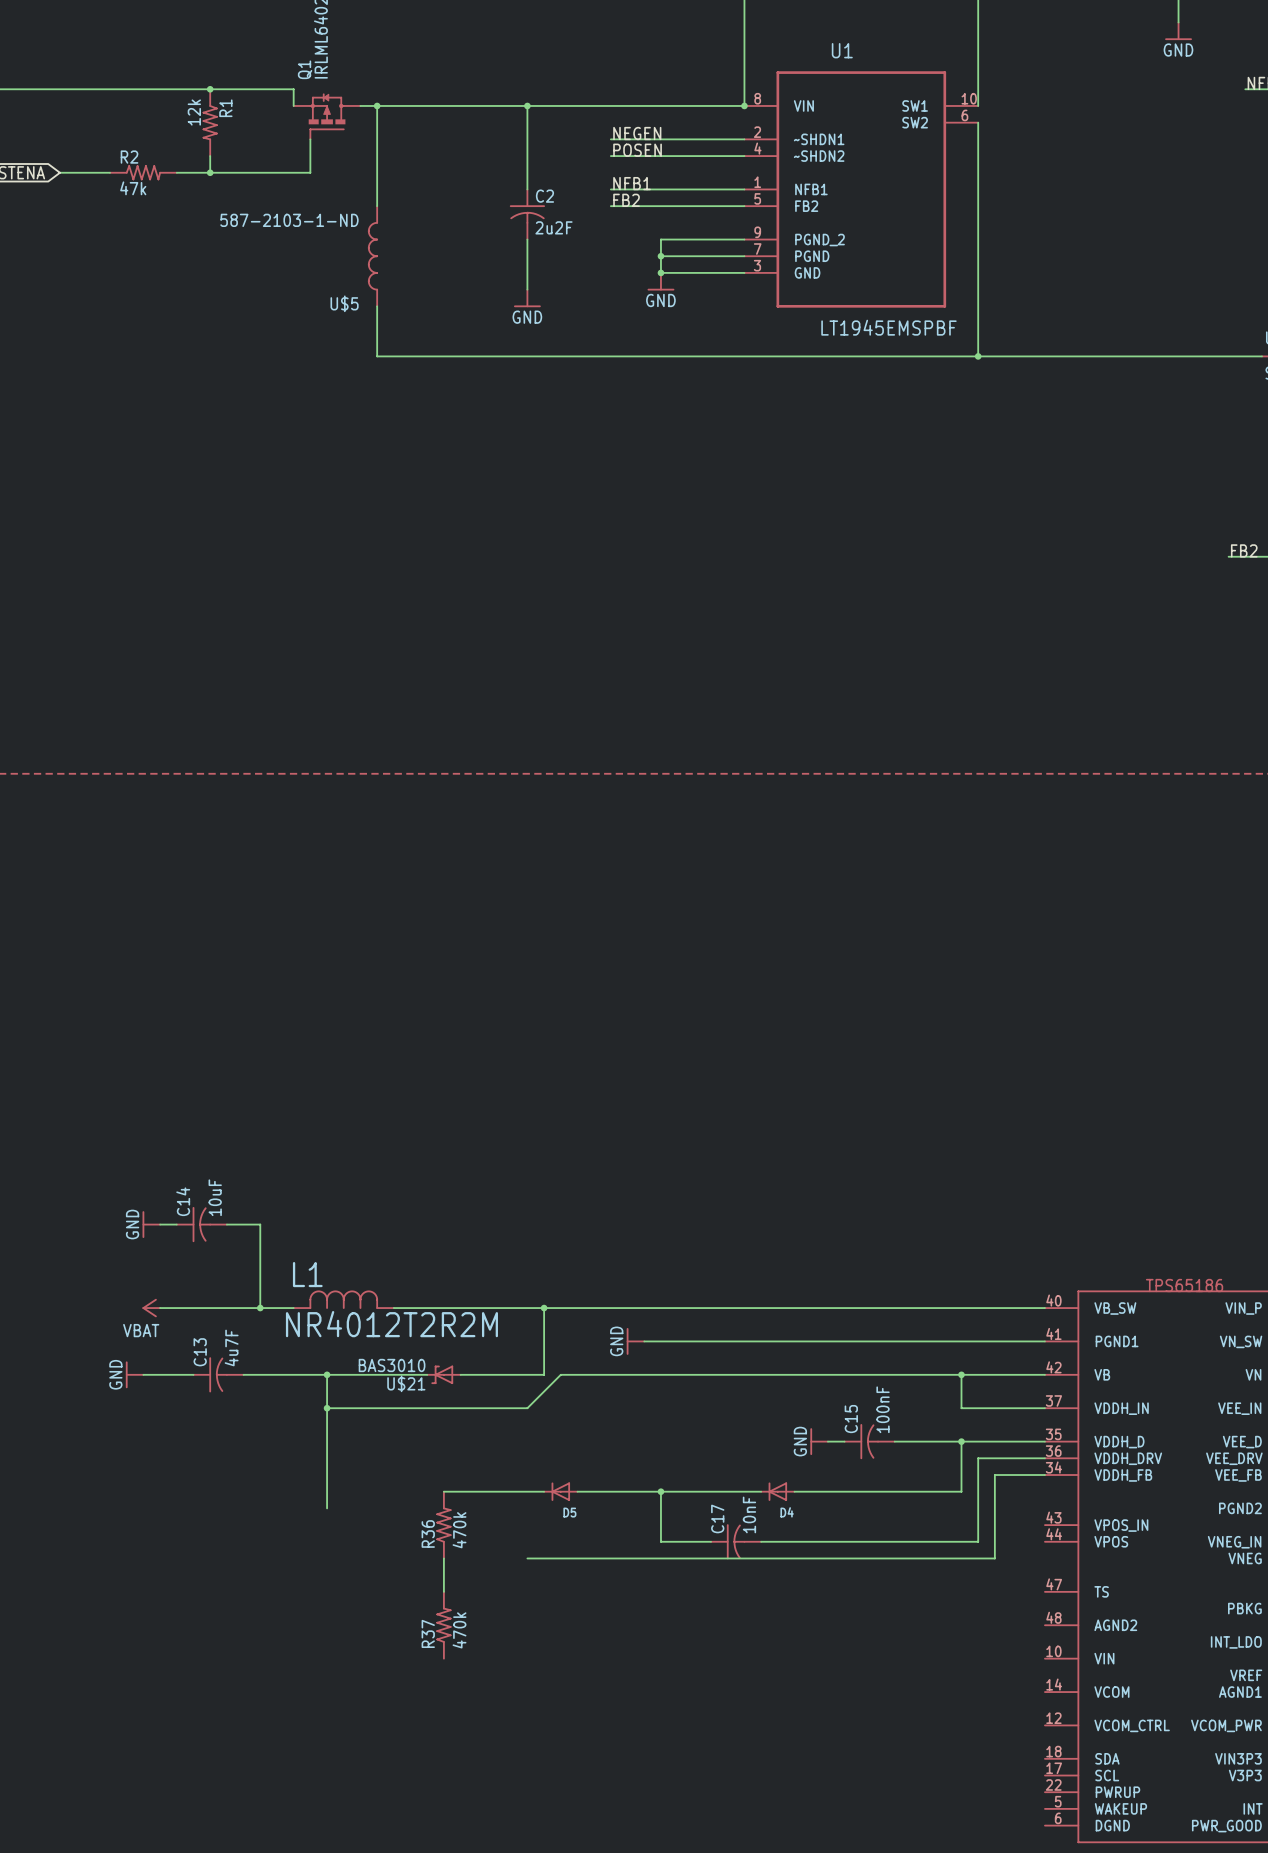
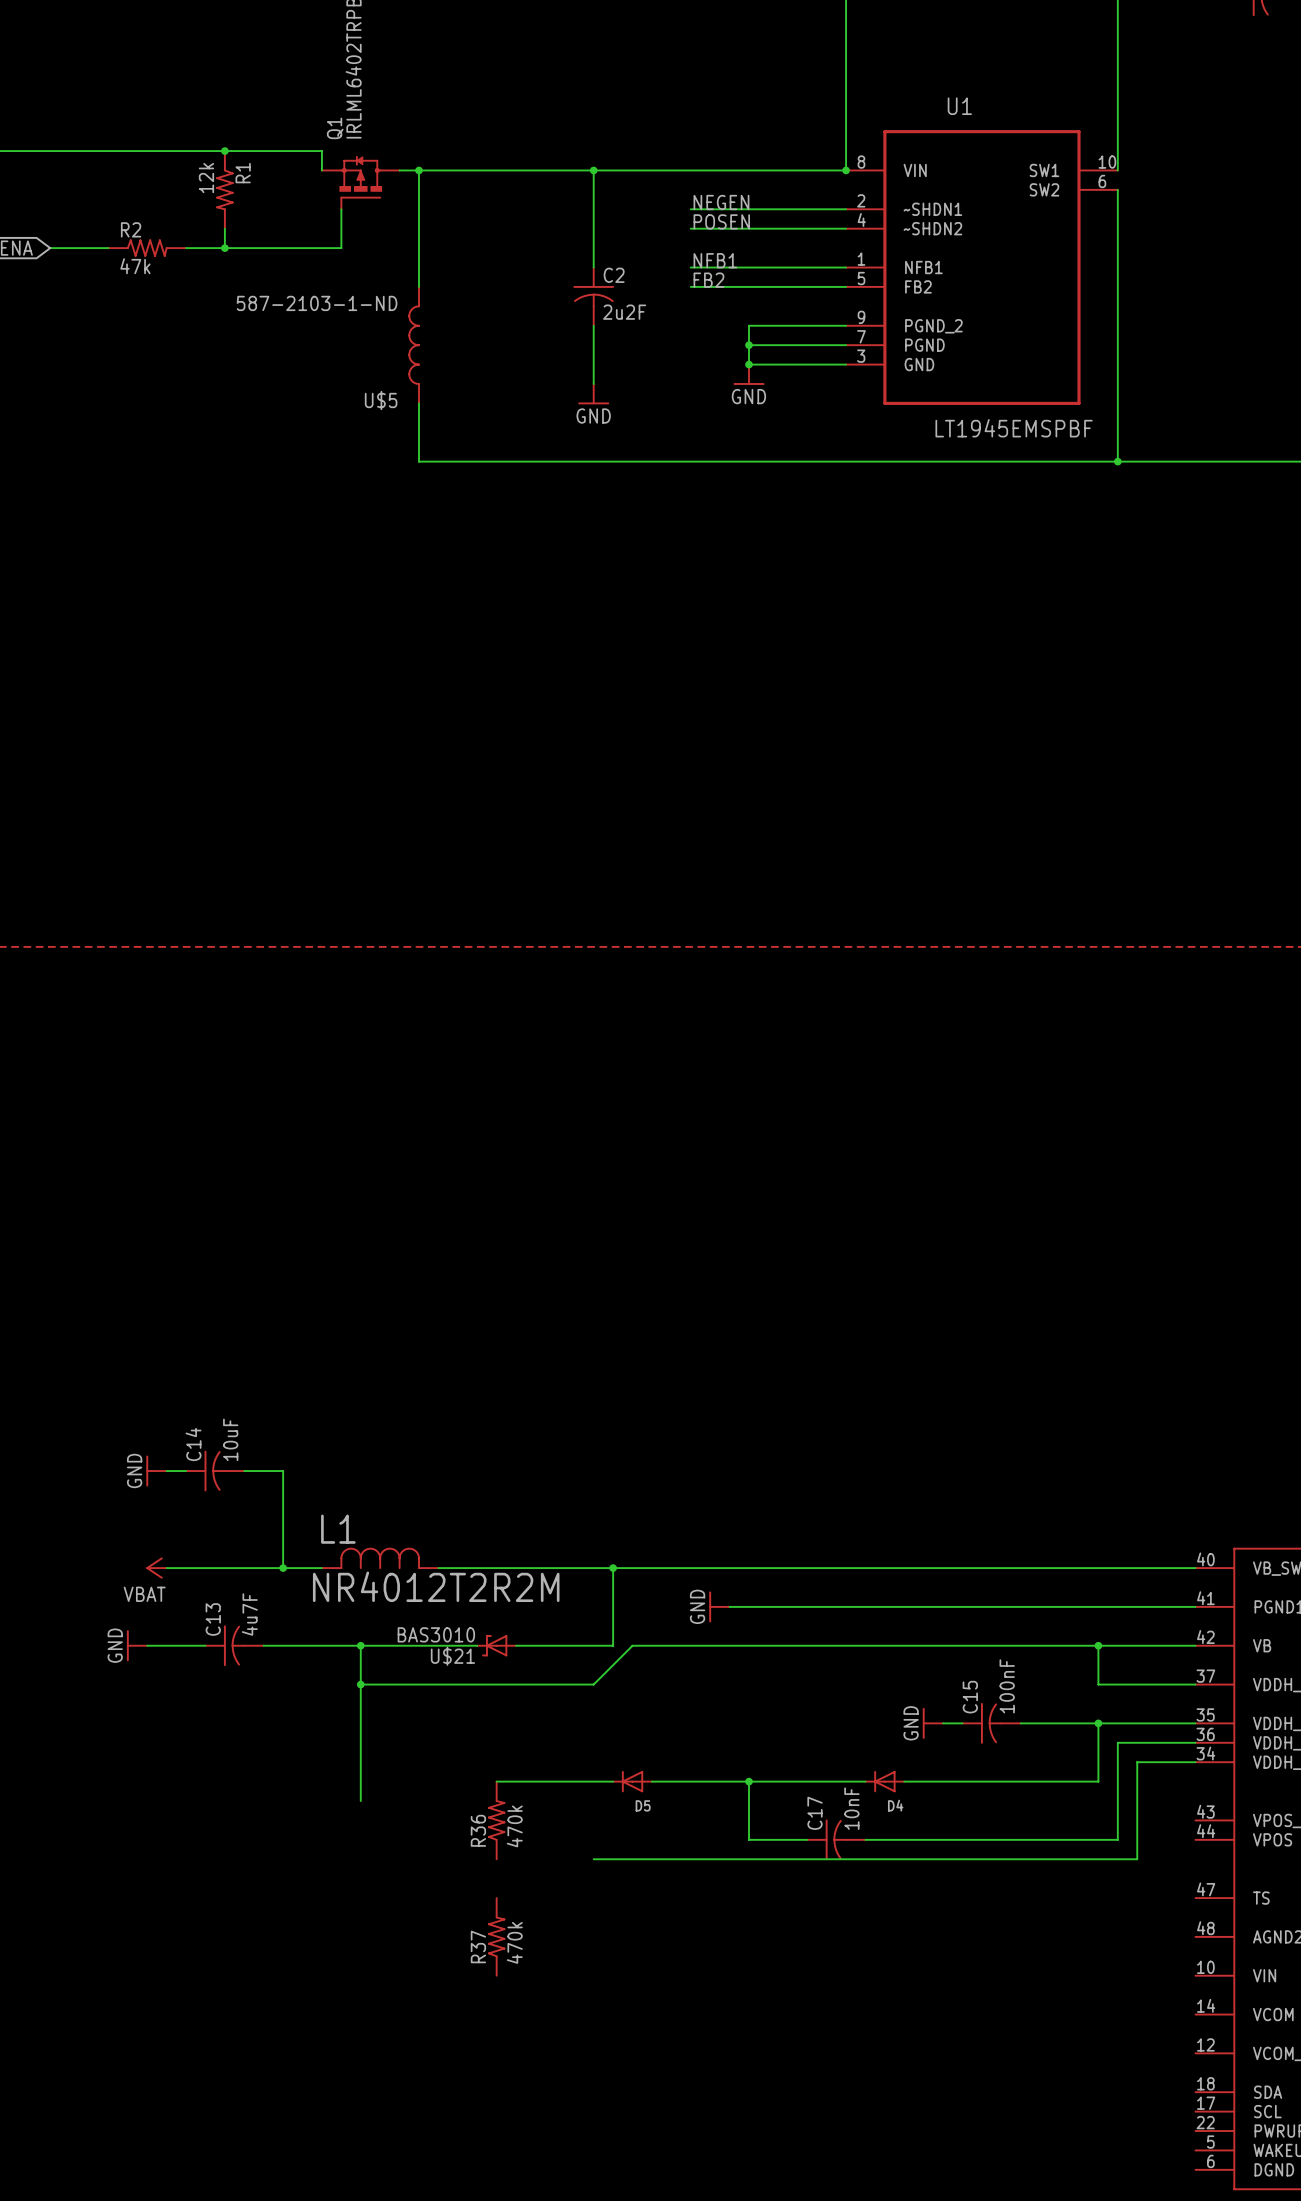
wire: (443, 1558) (443, 1591) -> none

